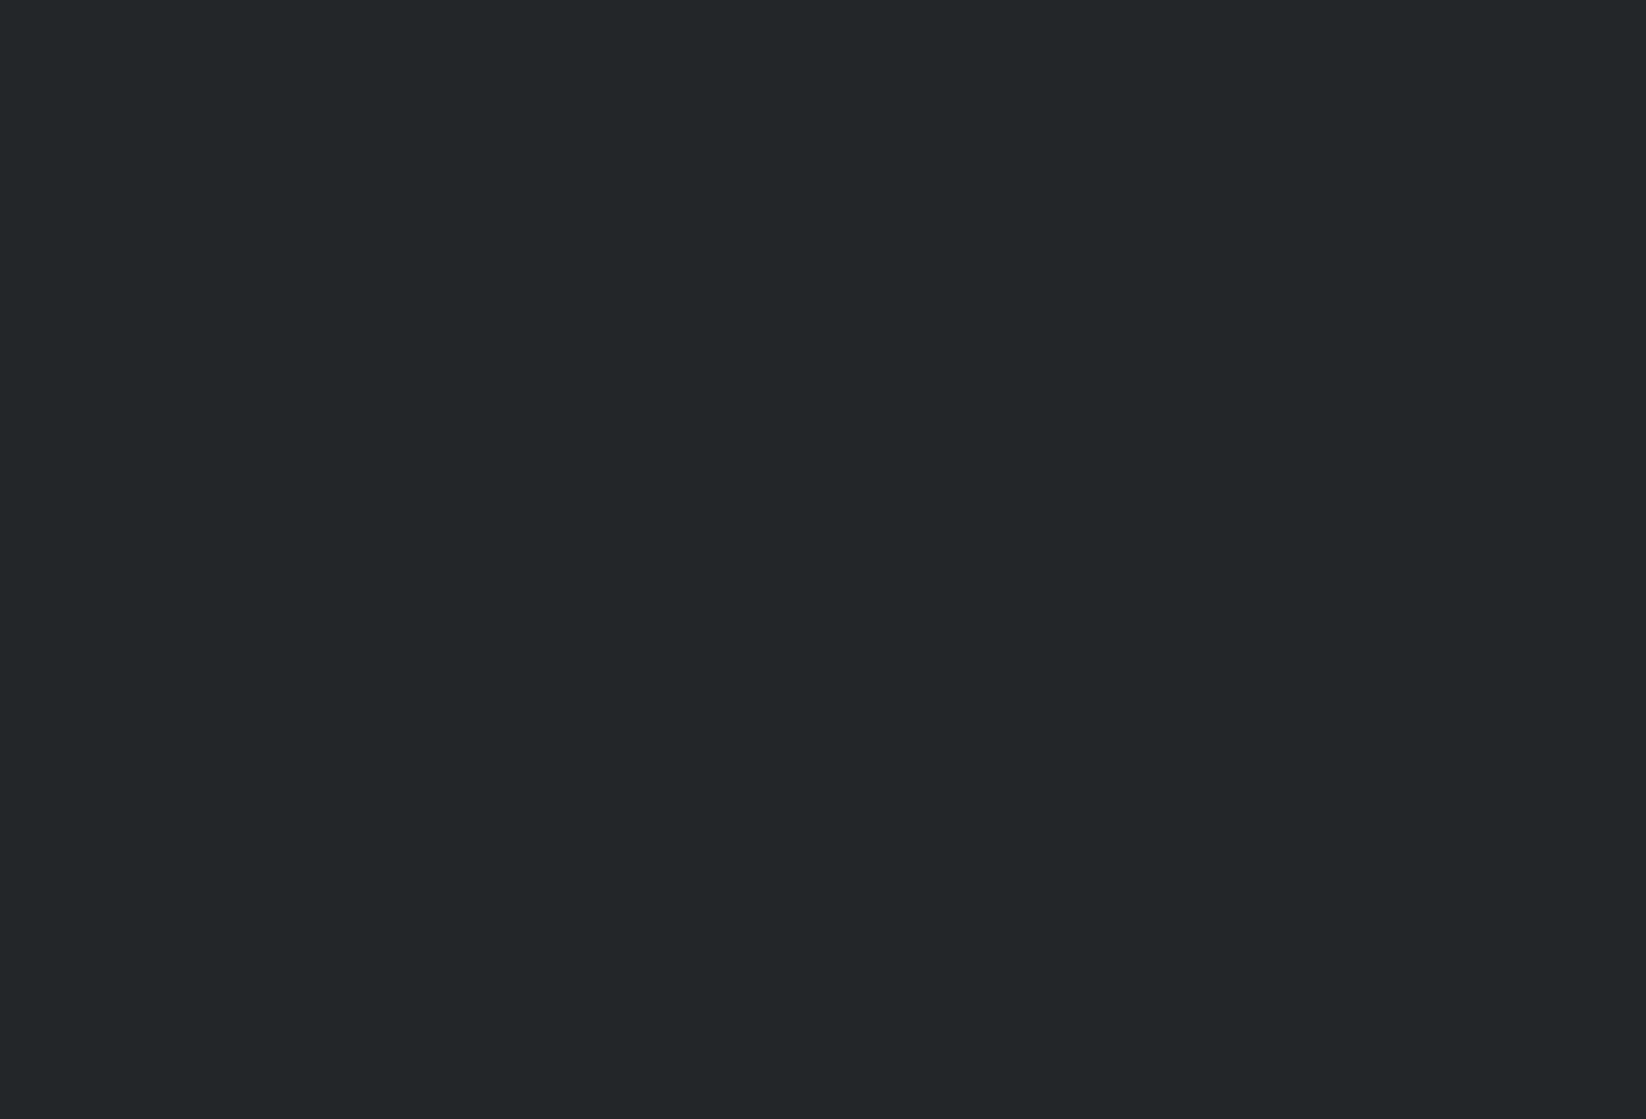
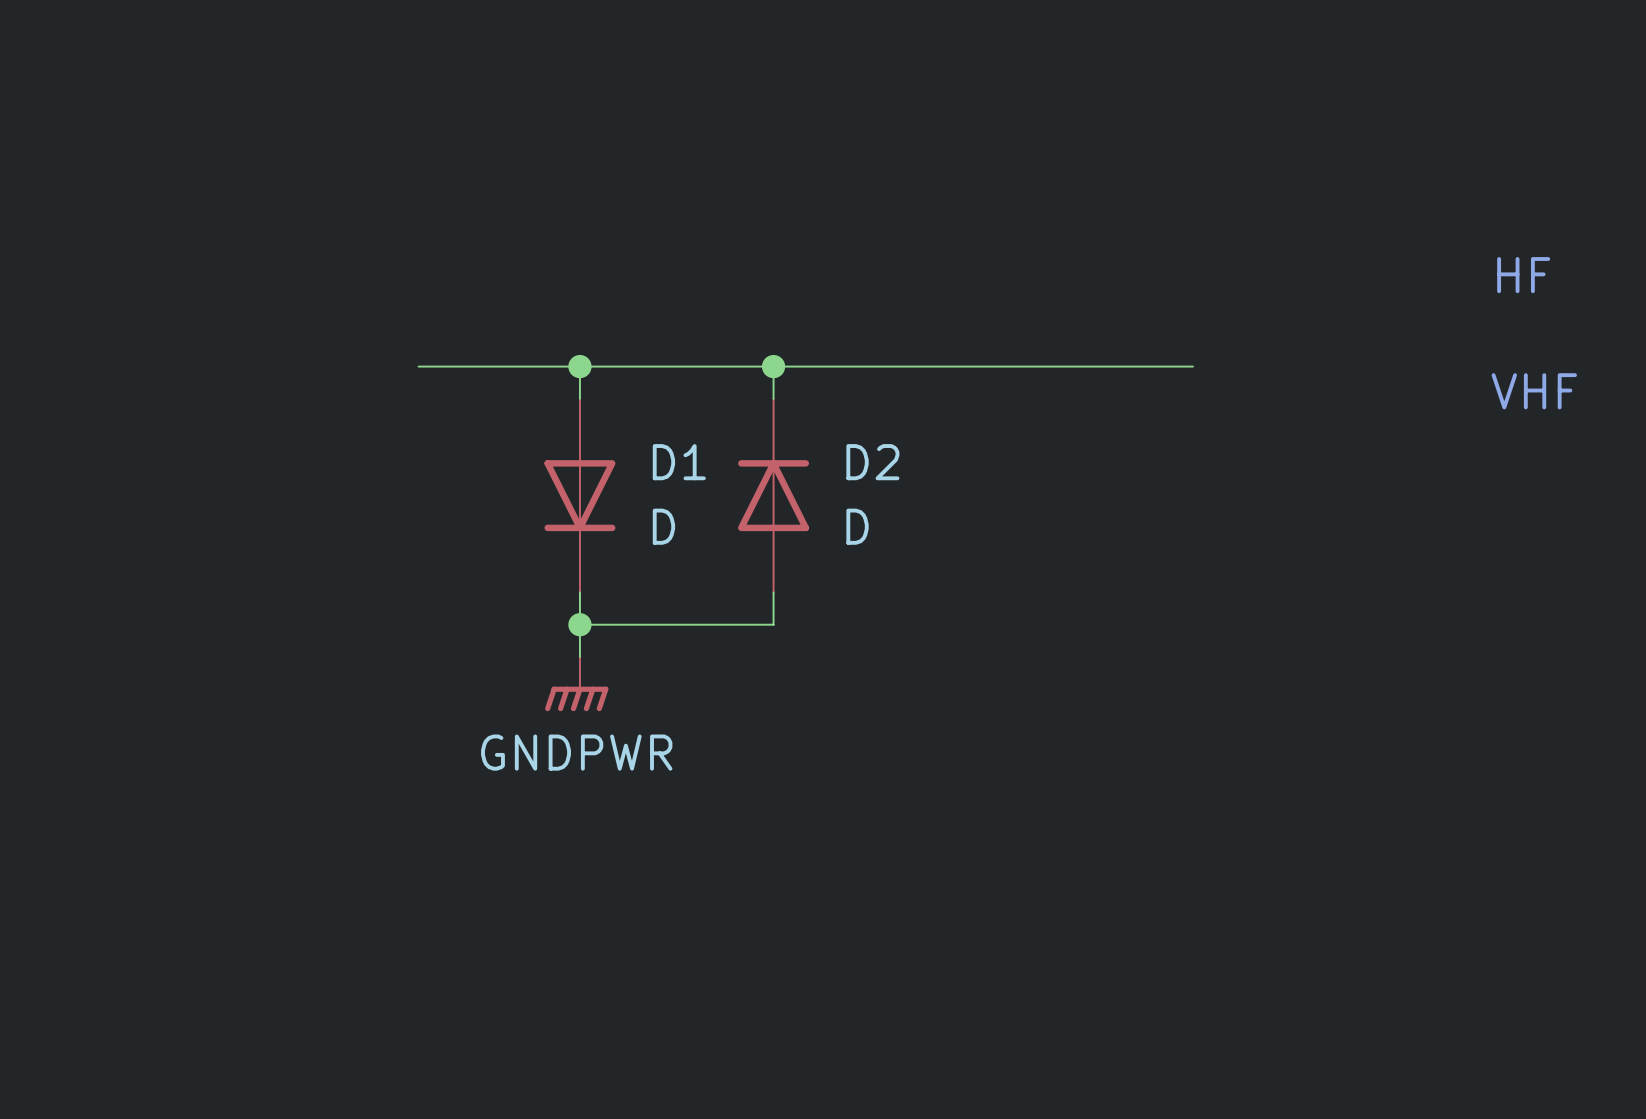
text: none -> HF (1523, 275)
wire: none -> (418, 366) (1193, 366)
wire: none -> (579, 366) (579, 398)
junction: none -> (579, 366)
wire: none -> (773, 366) (773, 398)
junction: none -> (773, 366)
text: none -> VHF (1534, 391)
D1: none -> D (579, 495)
D2: none -> D (773, 495)
wire: none -> (579, 592) (579, 656)
wire: none -> (773, 592) (773, 624) (579, 624)
junction: none -> (579, 624)
power symbol: none -> GNDPWR (576, 684)

